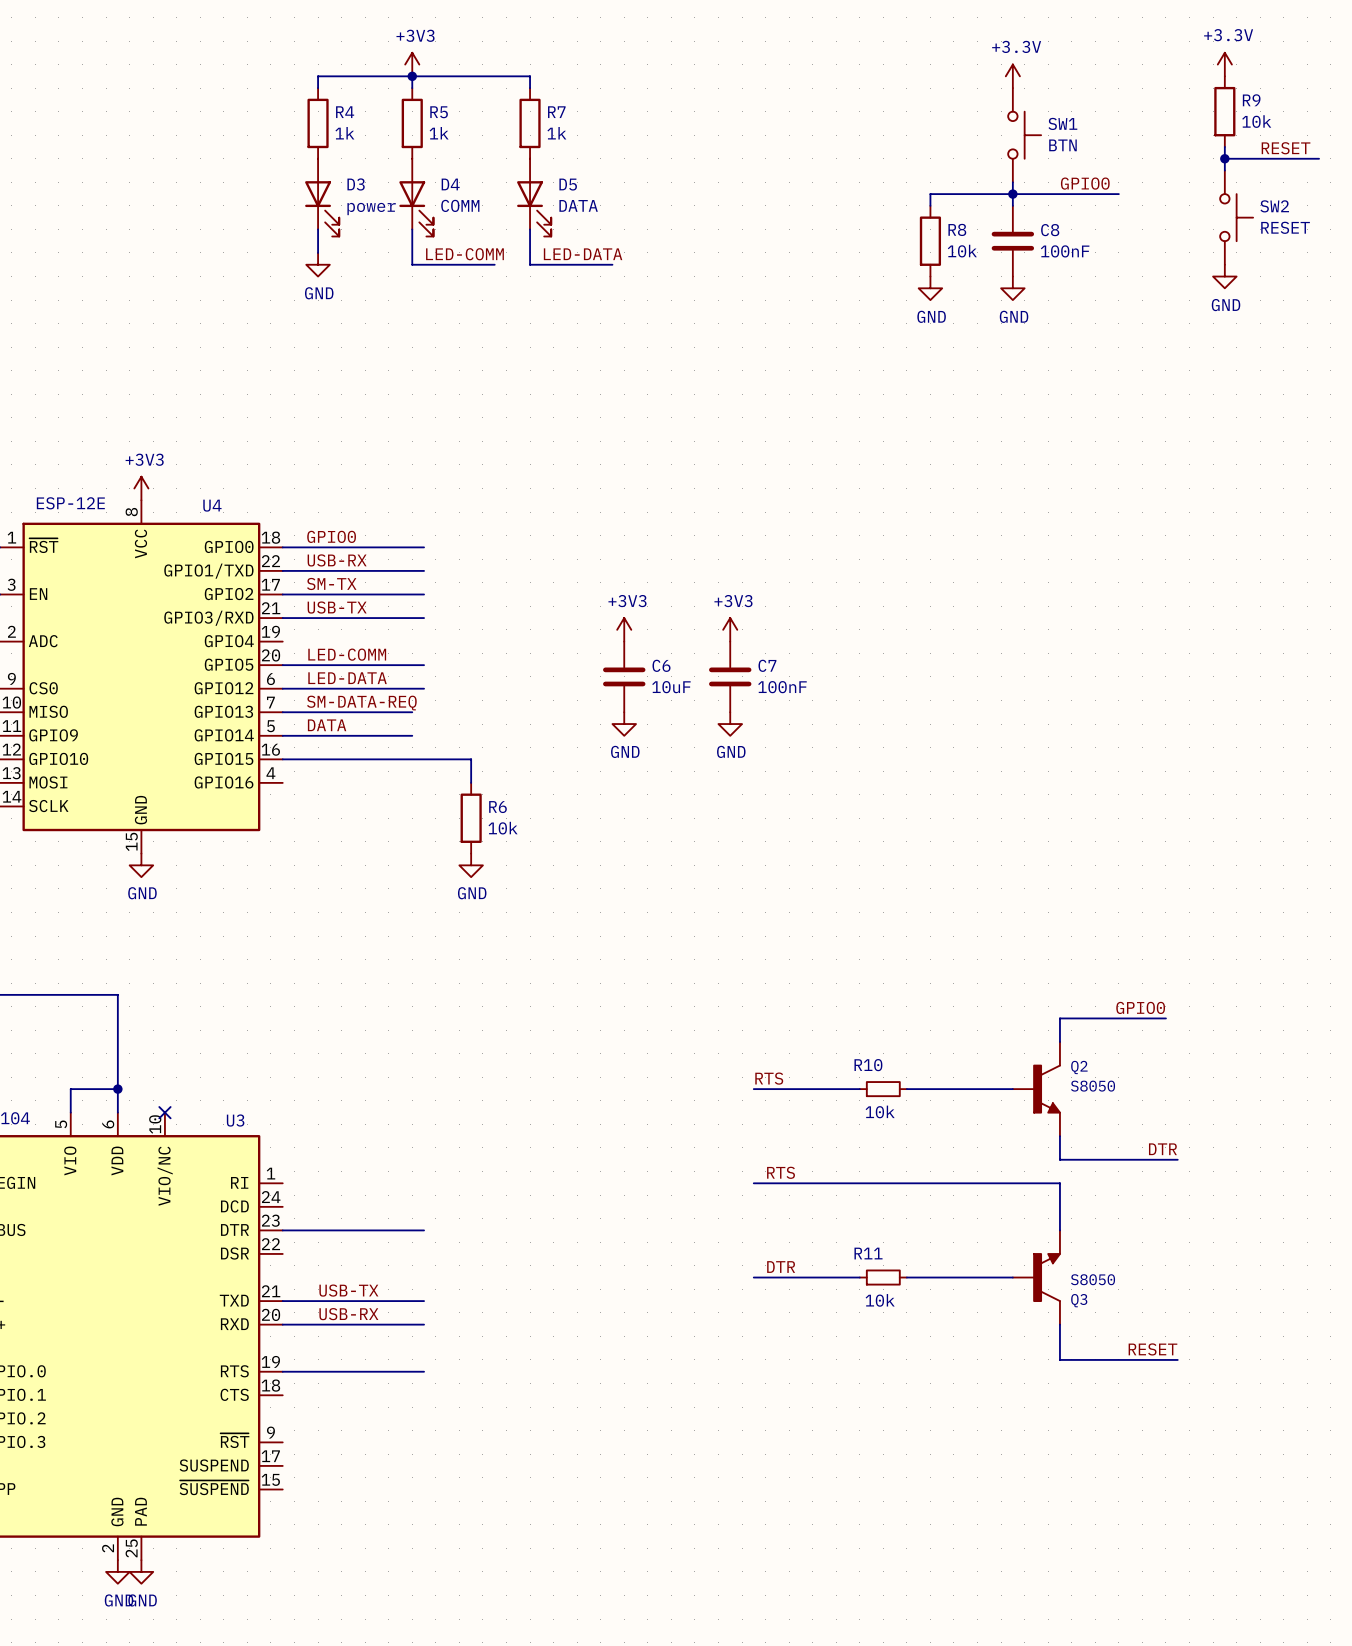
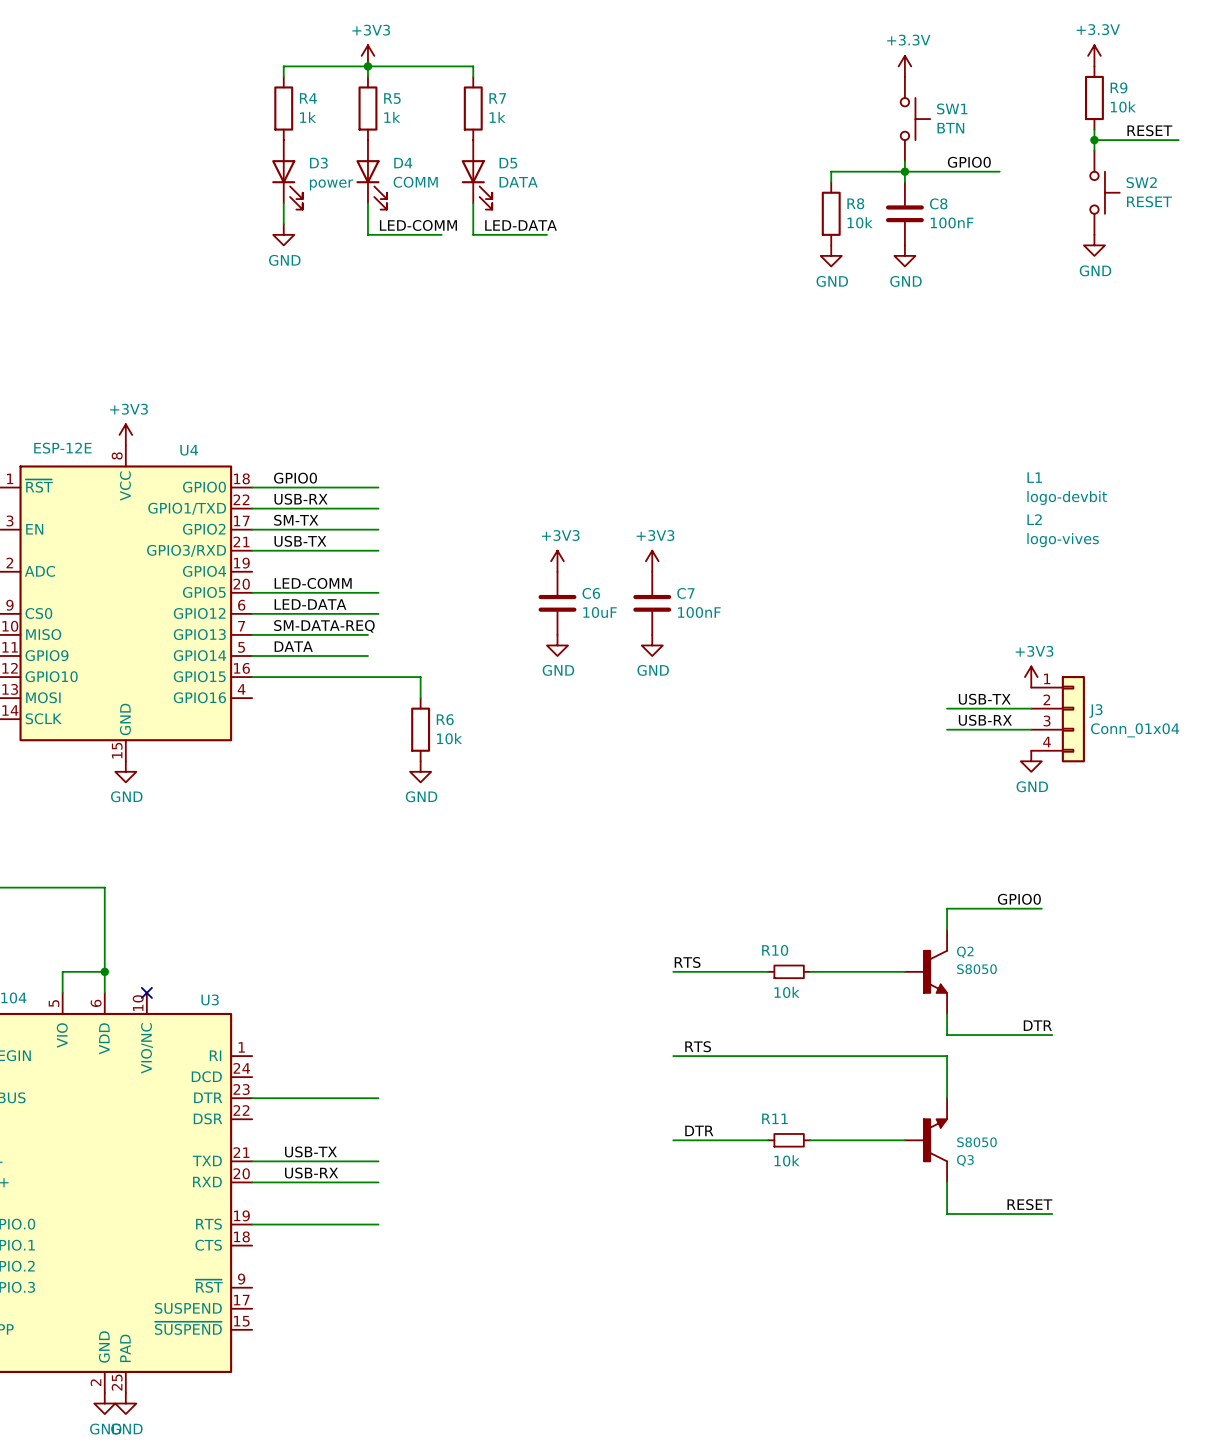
L1: none -> logo-devbit (1067, 488)
L2: none -> logo-vives (1063, 530)
power symbol: none -> +3V3 (1031, 677)
label: none -> USB-TX (984, 699)
wire: none -> (947, 708) (1031, 708)
J3: none -> Conn_01x04 (1058, 719)
label: none -> USB-RX (985, 720)
wire: none -> (947, 729) (1031, 729)
power symbol: none -> GND (1031, 761)

